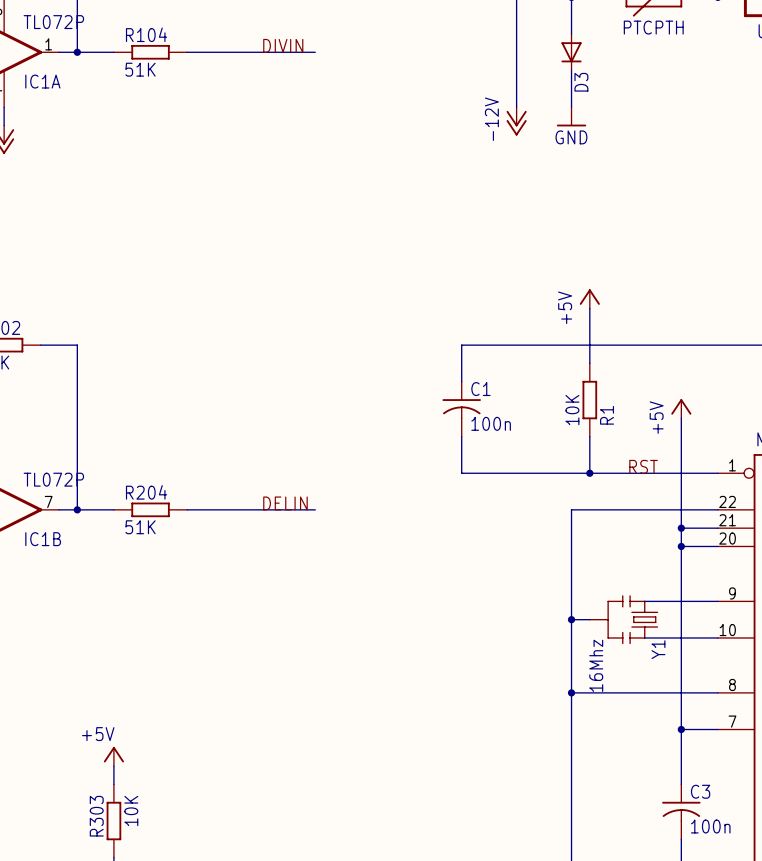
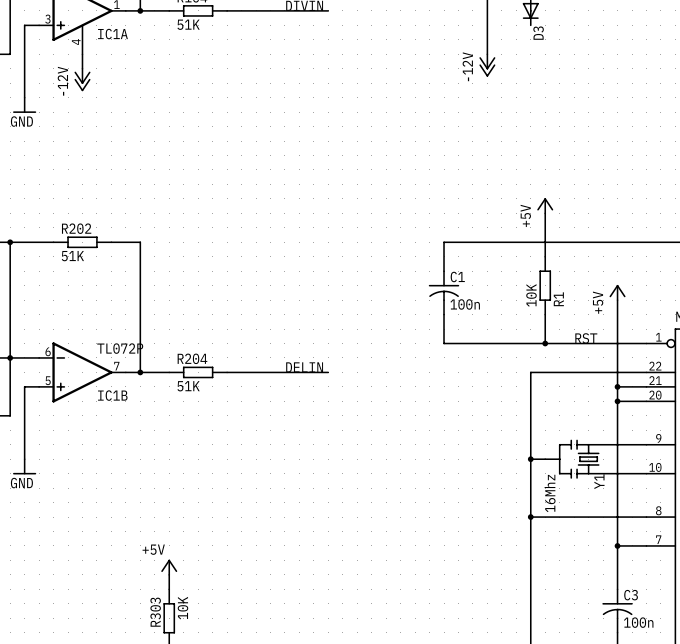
wire: (571, 70) (571, 107) -> none
power symbol: GND (571, 116) -> none

